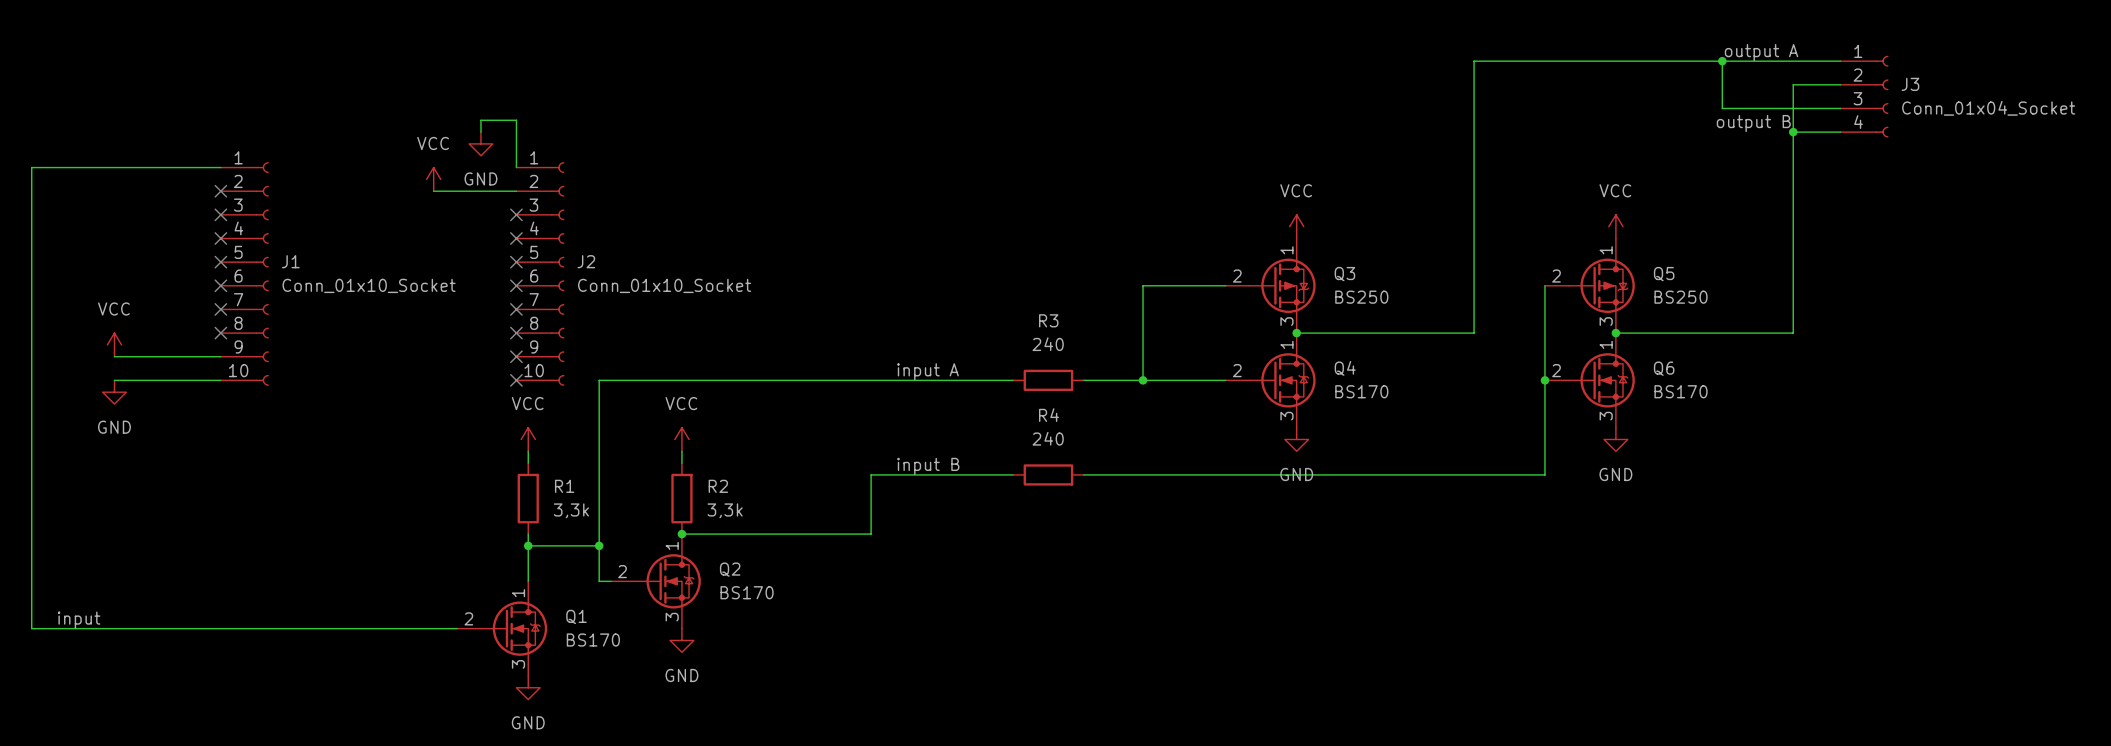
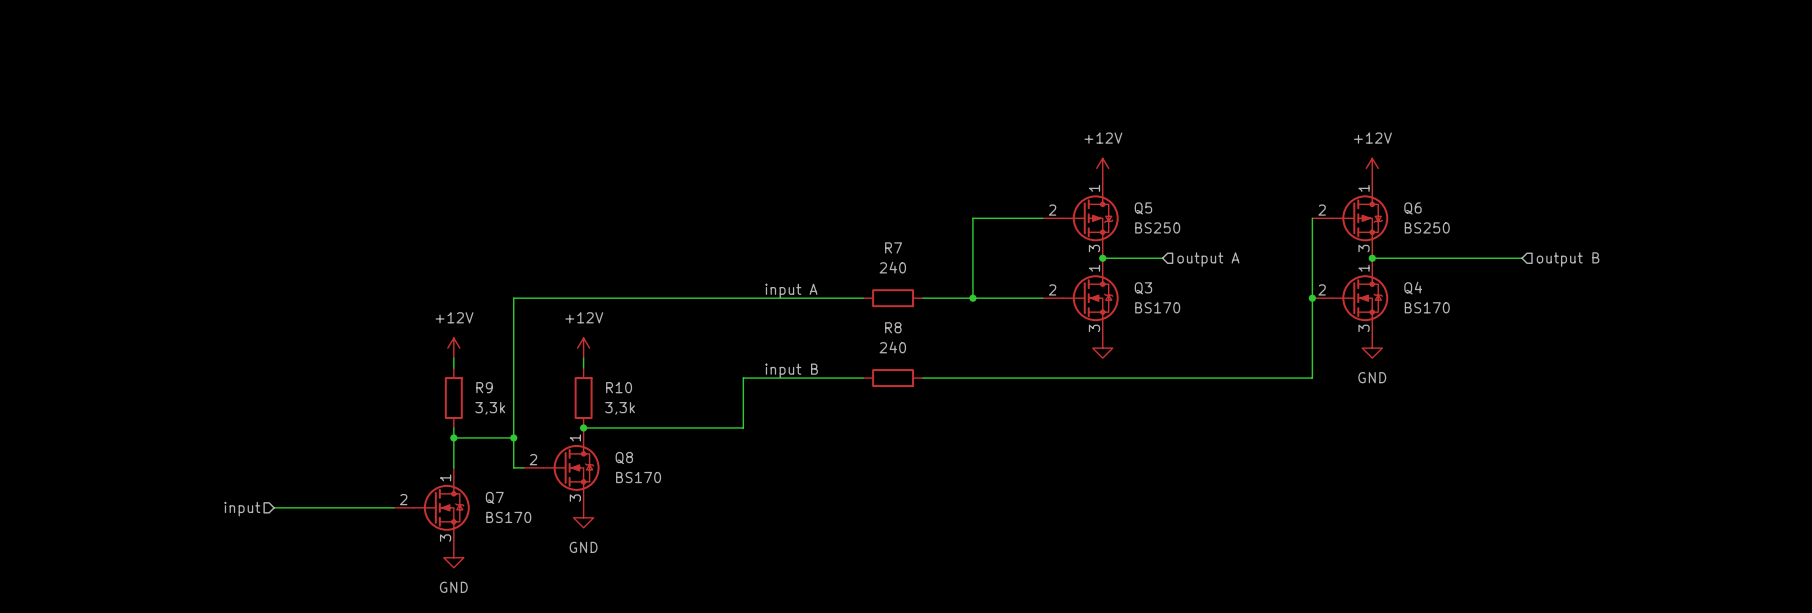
label: output A (1761, 52) -> none
wire: (1722, 61) (1722, 108) (1840, 108) -> none
junction: (1722, 61) -> none
wire: (1840, 61) (1474, 61) (1474, 333) (1367, 333) -> none
wire: (1840, 84) (1793, 84) (1793, 333) -> none
J3: Conn_01x04_Socket (1864, 96) -> none
label: output B (1753, 123) -> none
wire: (480, 132) (480, 120) (516, 120) (516, 167) -> none
wire: (1793, 132) (1840, 132) -> none
junction: (1793, 132) -> none
power symbol: GND (480, 143) -> none
wire: (220, 167) (31, 167) (31, 628) (315, 628) -> none
power symbol: VCC (433, 179) -> none
no-connect mark: (220, 191) -> none
wire: (433, 191) (516, 191) -> none
no-connect mark: (220, 214) -> none
no-connect mark: (516, 214) -> none
power symbol: VCC (1296, 226) -> +12V (1102, 168)
power symbol: VCC (1615, 226) -> +12V (1372, 168)
no-connect mark: (220, 238) -> none
no-connect mark: (516, 238) -> none
no-connect mark: (220, 262) -> none
no-connect mark: (516, 262) -> none
J1: Conn_01x10_Socket (244, 273) -> none
J2: Conn_01x10_Socket (540, 273) -> none
Q3 name: Q3 (1344, 274) -> Q5 (1143, 208)
Q5 name: Q5 (1664, 274) -> Q6 (1412, 208)
no-connect mark: (220, 285) -> none
no-connect mark: (516, 285) -> none
no-connect mark: (220, 309) -> none
no-connect mark: (516, 309) -> none
R3 name: R3 (1048, 320) -> R7 (893, 247)
no-connect mark: (220, 333) -> none
no-connect mark: (516, 333) -> none
hierarchical label: none -> output A (1208, 259)
hierarchical label: none -> output B (1568, 259)
power symbol: VCC (114, 344) -> none
wire: (114, 356) (220, 356) -> none
no-connect mark: (516, 356) -> none
Q4 name: Q4 (1345, 368) -> Q3 (1143, 288)
Q6 name: Q6 (1664, 368) -> Q4 (1413, 288)
wire: (114, 380) (220, 380) -> none
no-connect mark: (516, 380) -> none
power symbol: GND (114, 392) -> none
R4 name: R4 (1049, 415) -> R8 (893, 327)
power symbol: VCC (528, 439) -> +12V (453, 348)
power symbol: VCC (681, 439) -> +12V (583, 348)
power symbol text: GND (1296, 474) -> none
R1 name: R1 (564, 486) -> R9 (484, 387)
R2 name: R2 (718, 486) -> R10 (619, 387)
Q2 name: Q2 (730, 569) -> Q8 (624, 458)
Q1 name: Q1 (576, 616) -> Q7 (494, 497)
label: input (79, 620) -> none
hierarchical label: none -> input (242, 509)

